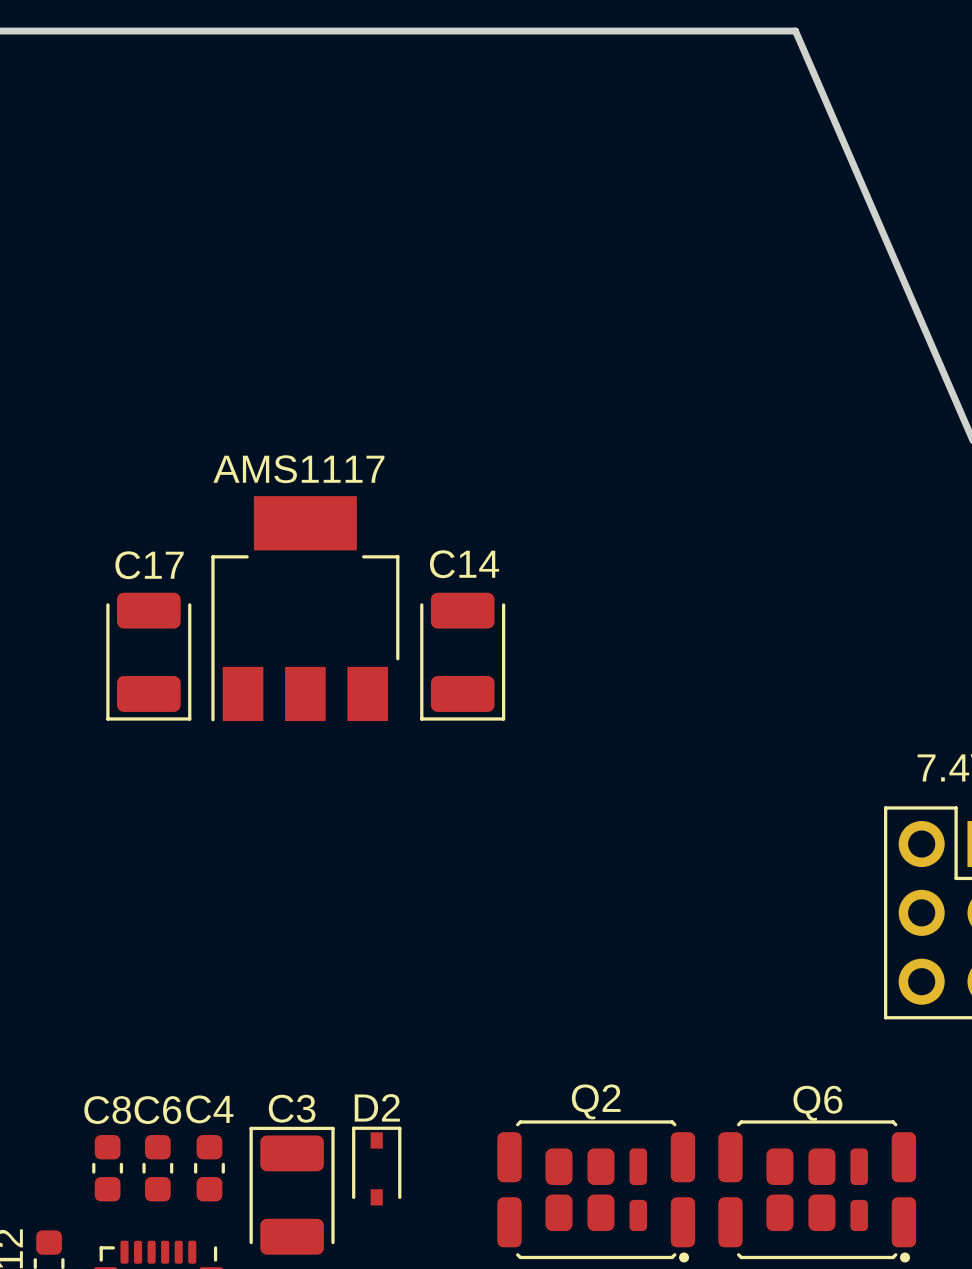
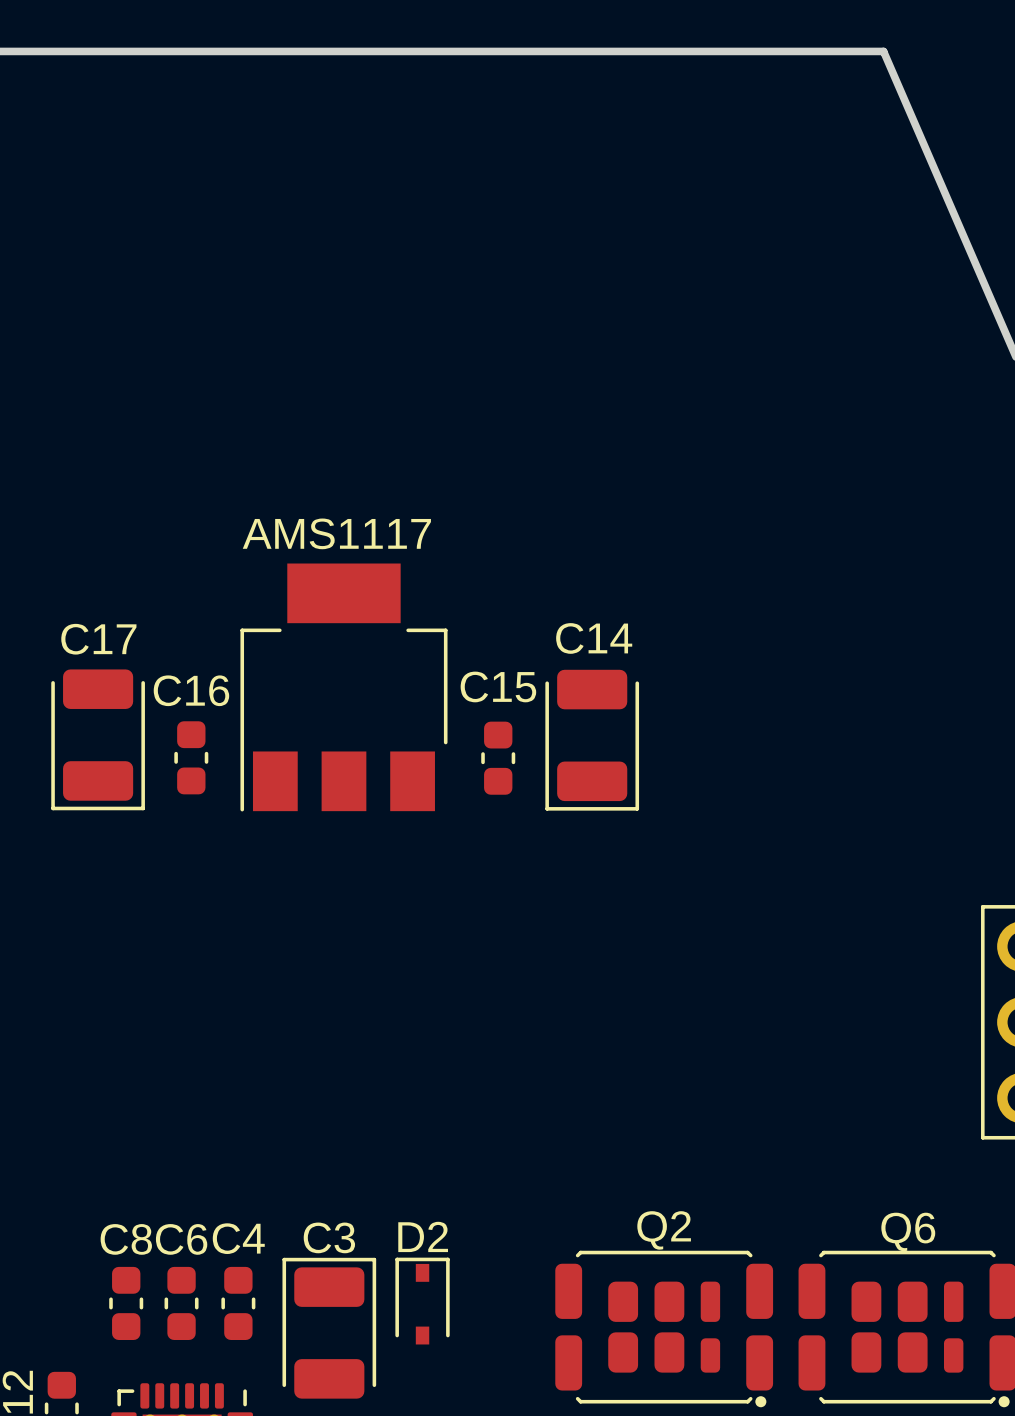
C17 position: (148, 656) -> (98, 739)
C14 position: (462, 656) -> (592, 740)
C16: none -> (191, 757)
C15: none -> (498, 758)

